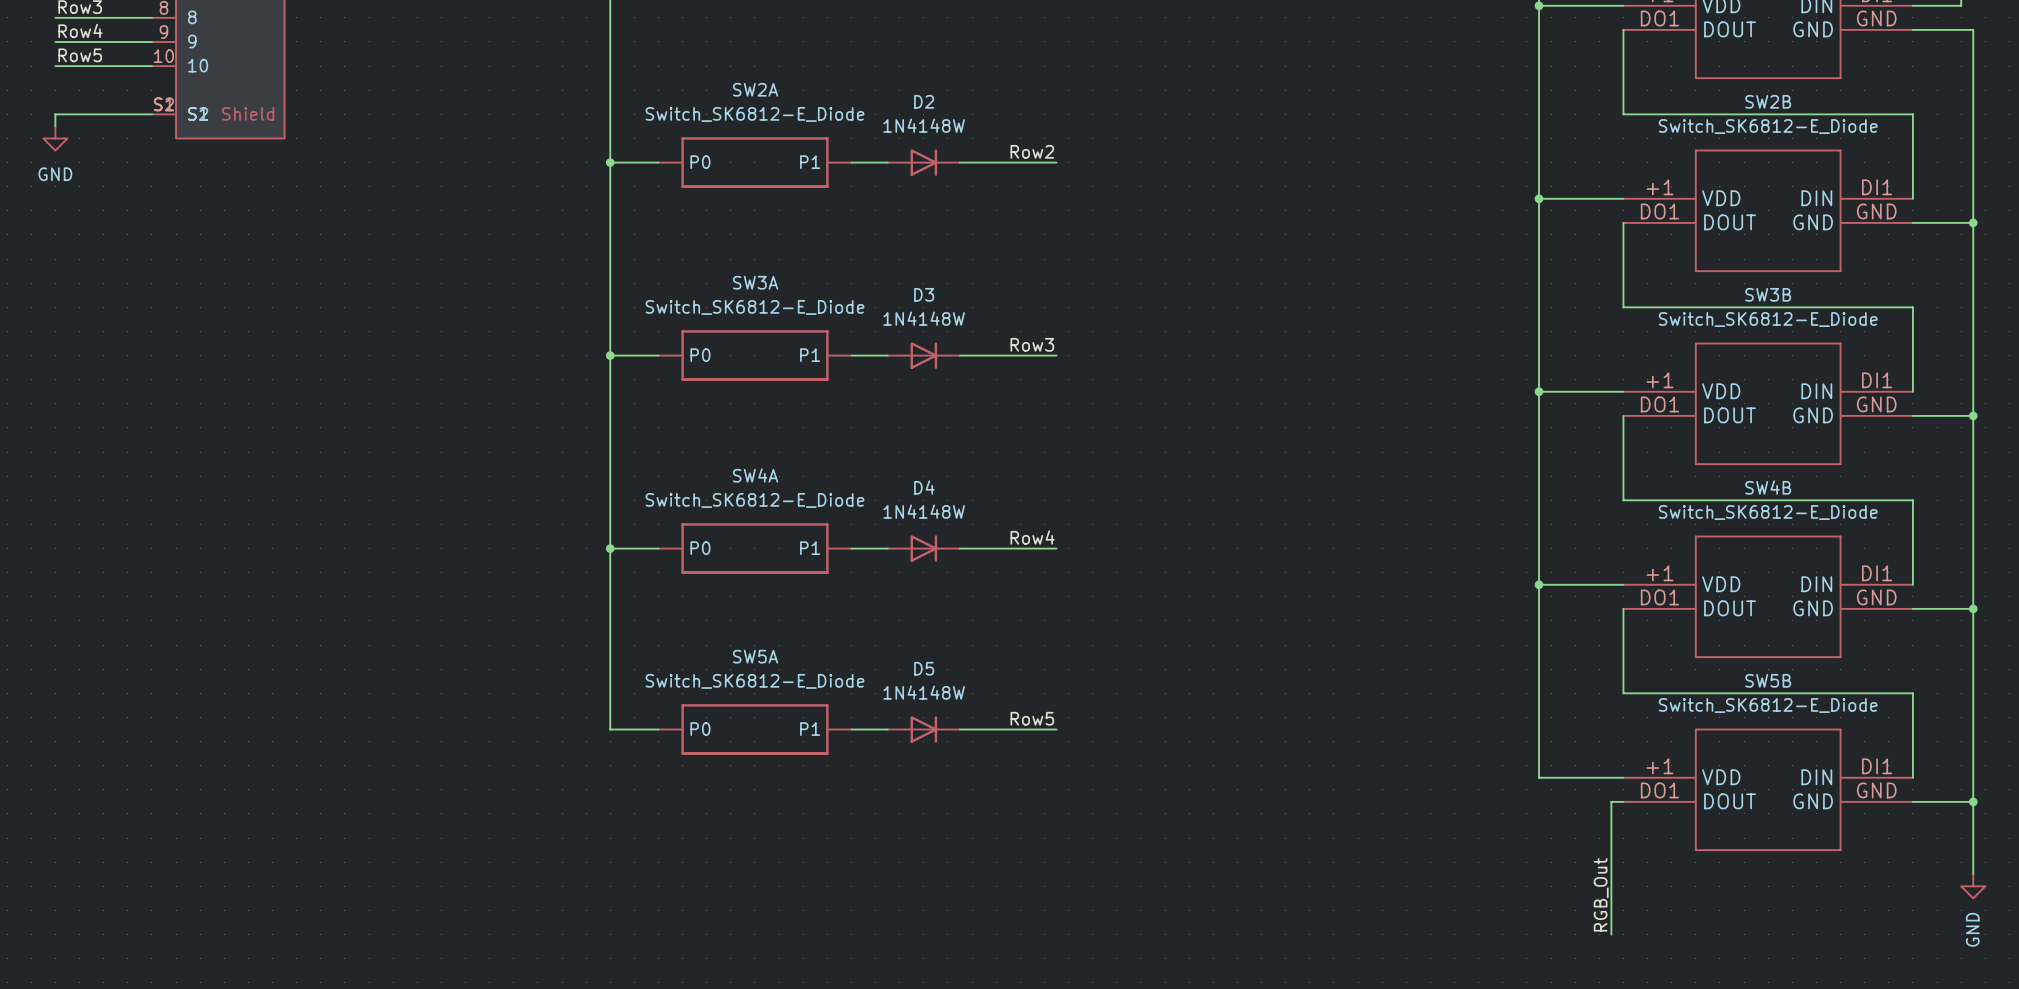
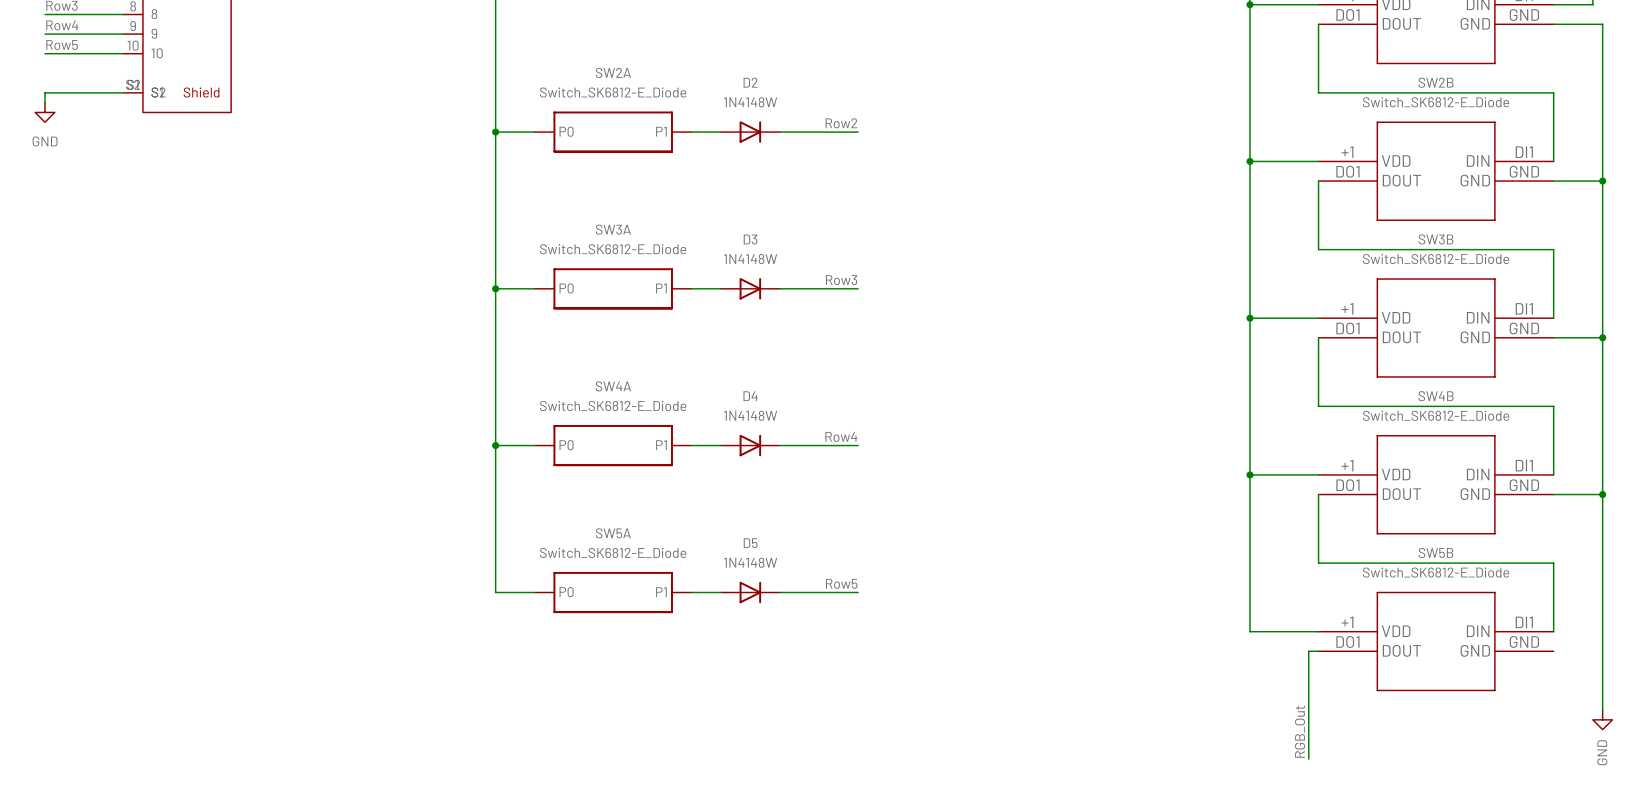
wire: (1912, 801) (1973, 801) -> none
junction: (1973, 801) -> none

